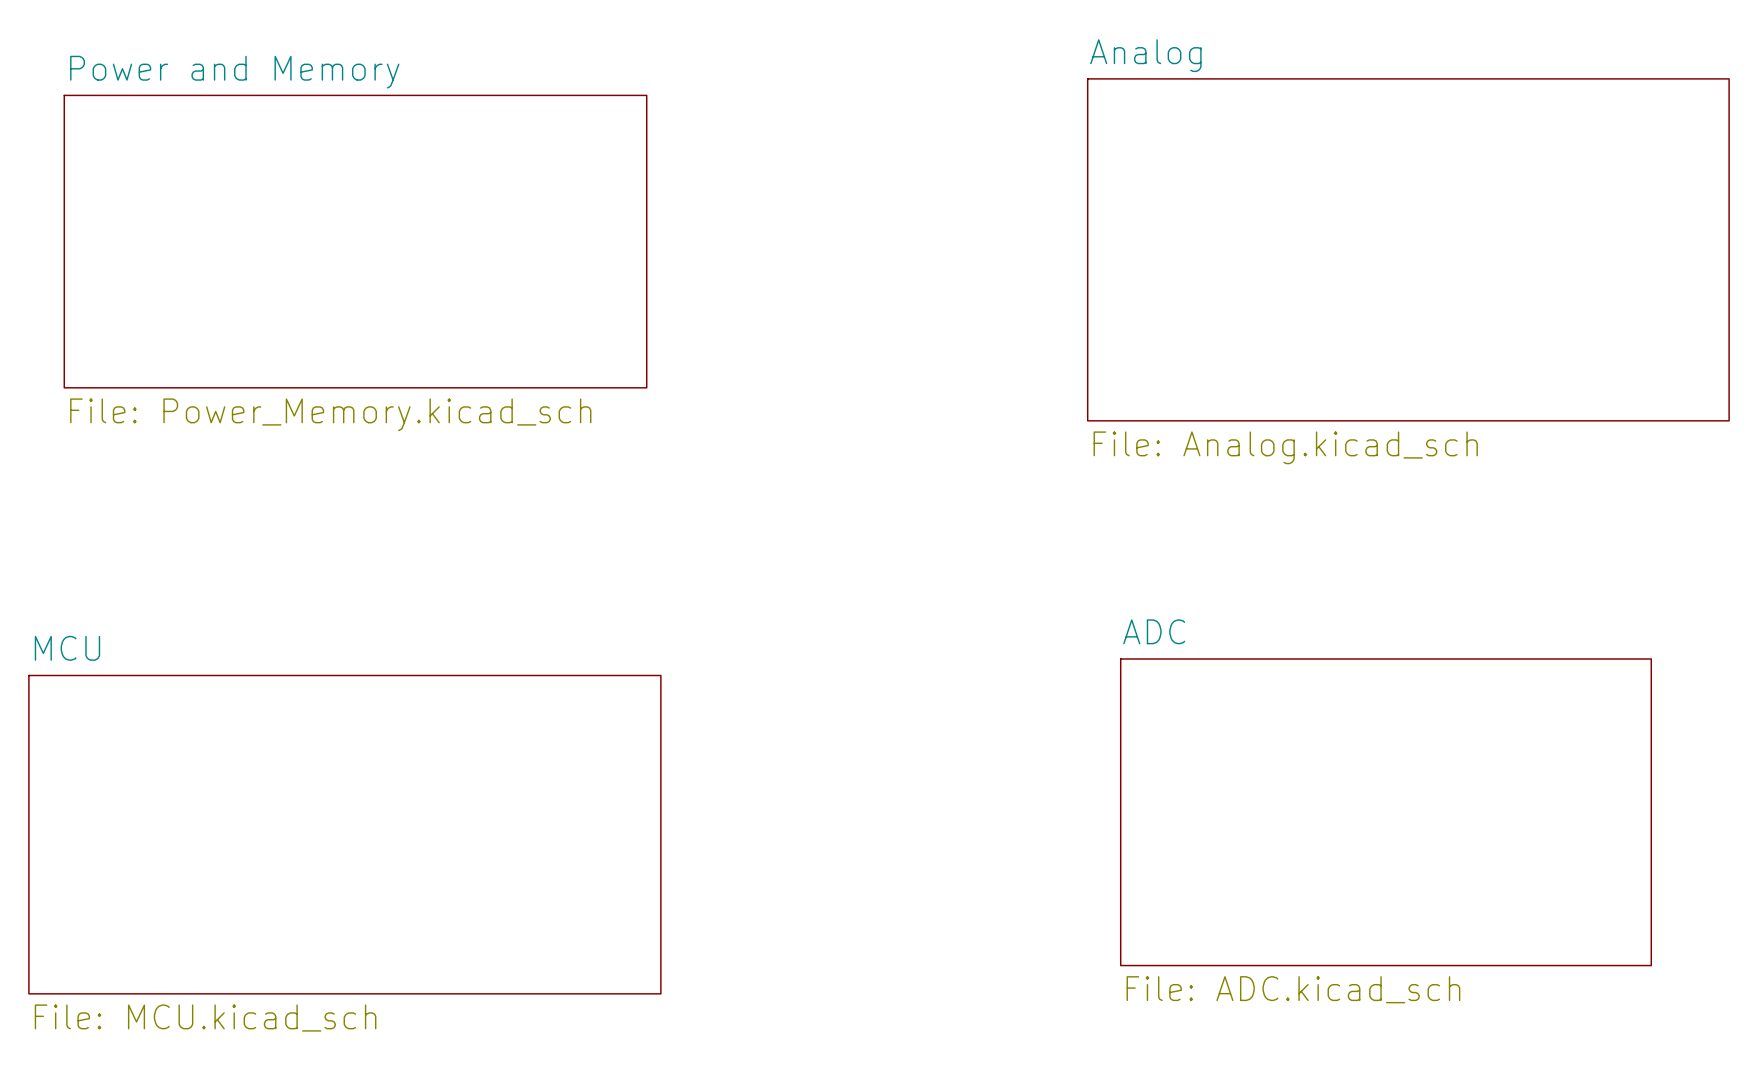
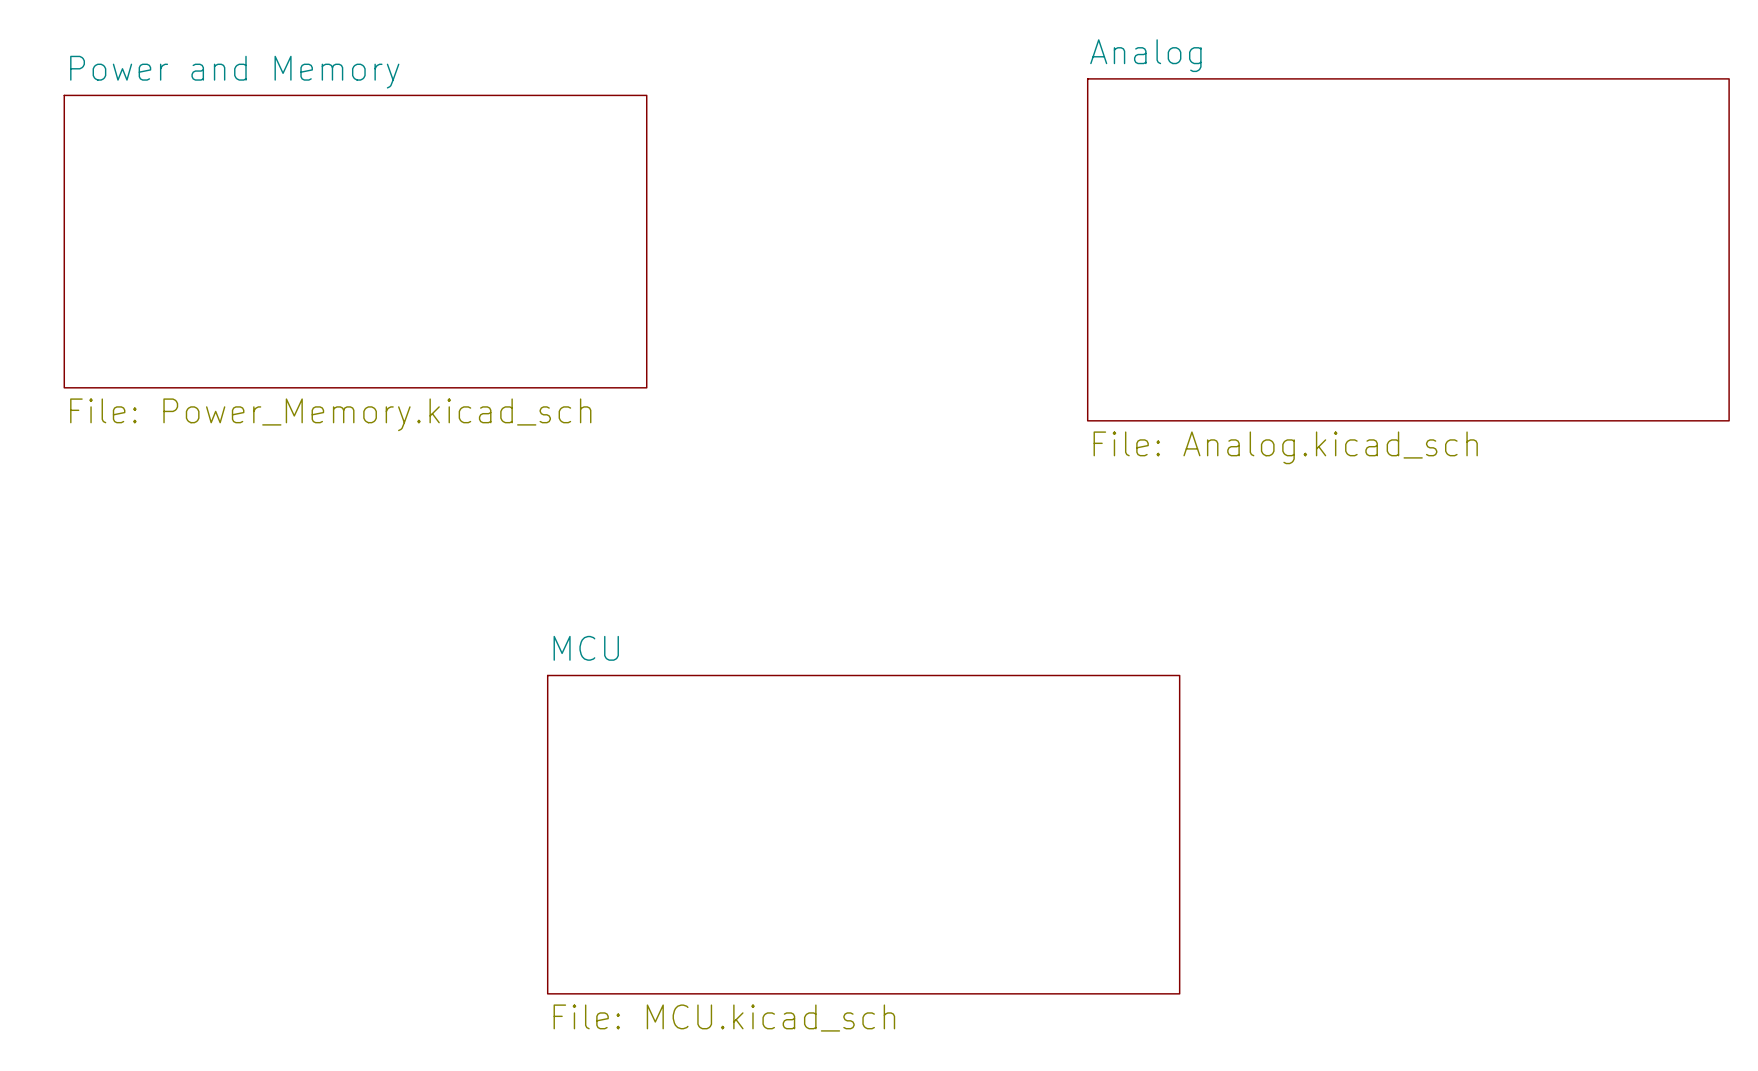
sheet ADC: File: ADC.kicad_sch (1385, 812) -> none
sheet MCU: File: MCU.kicad_sch (344, 834) -> none
sheet MCU: none -> File: MCU.kicad_sch (863, 834)

